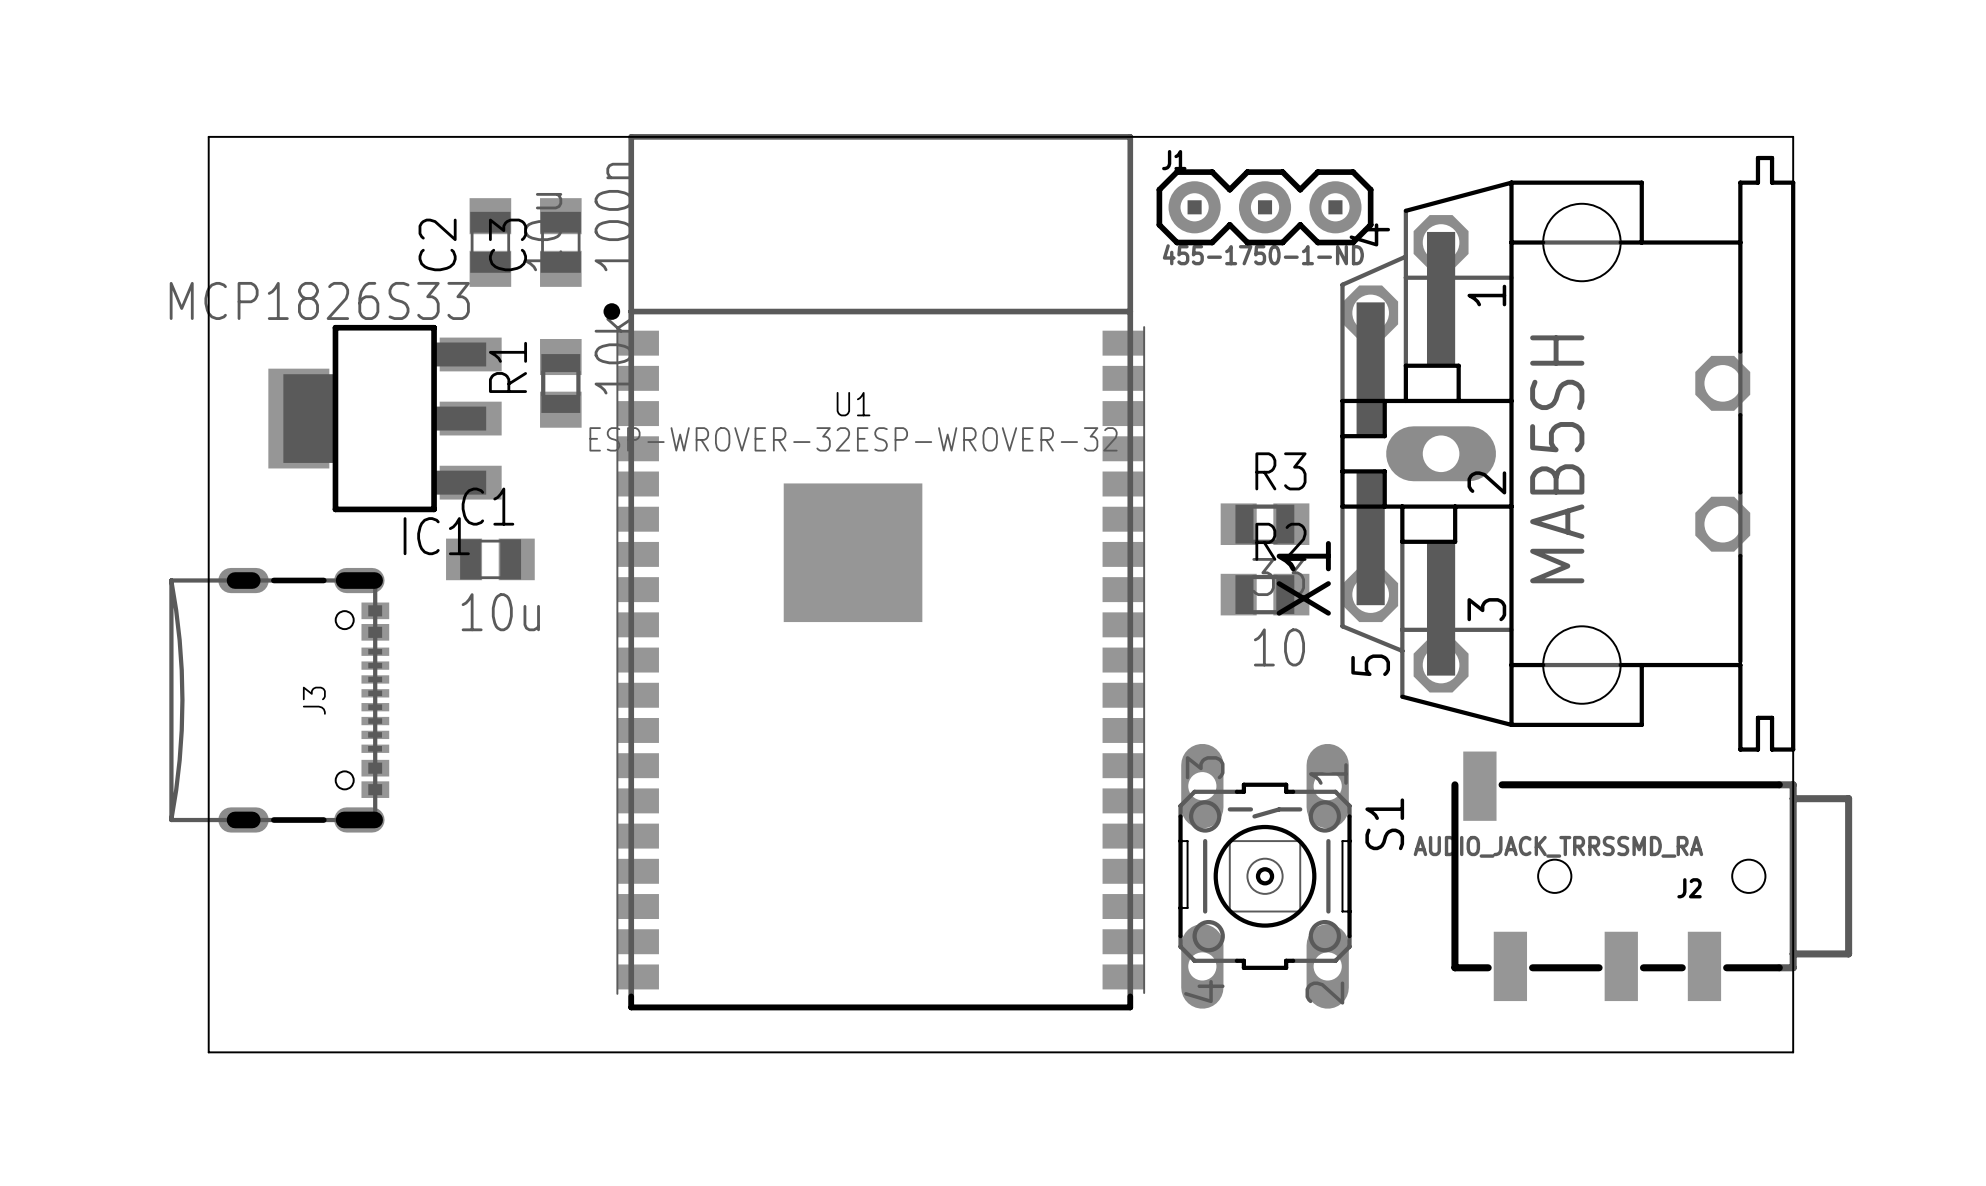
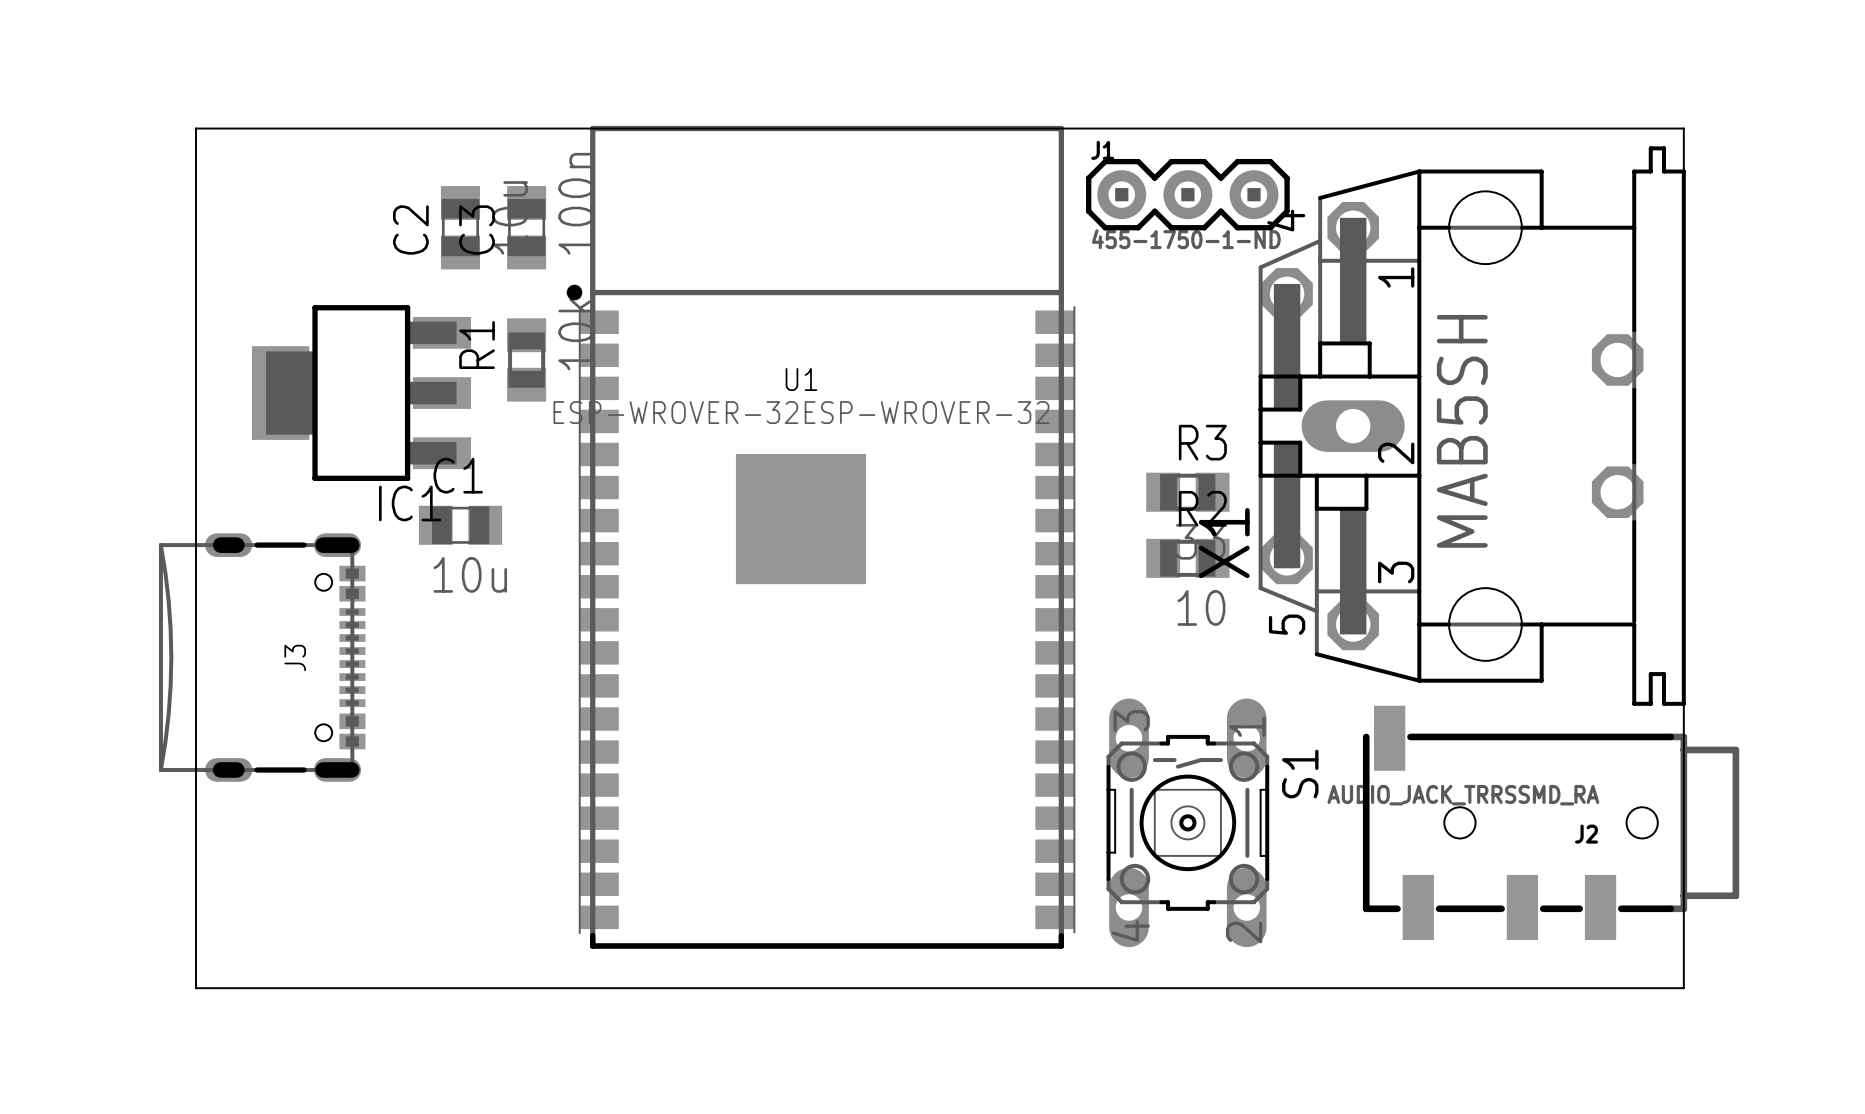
IC1 value: MCP1826S33 (319, 300) -> none

